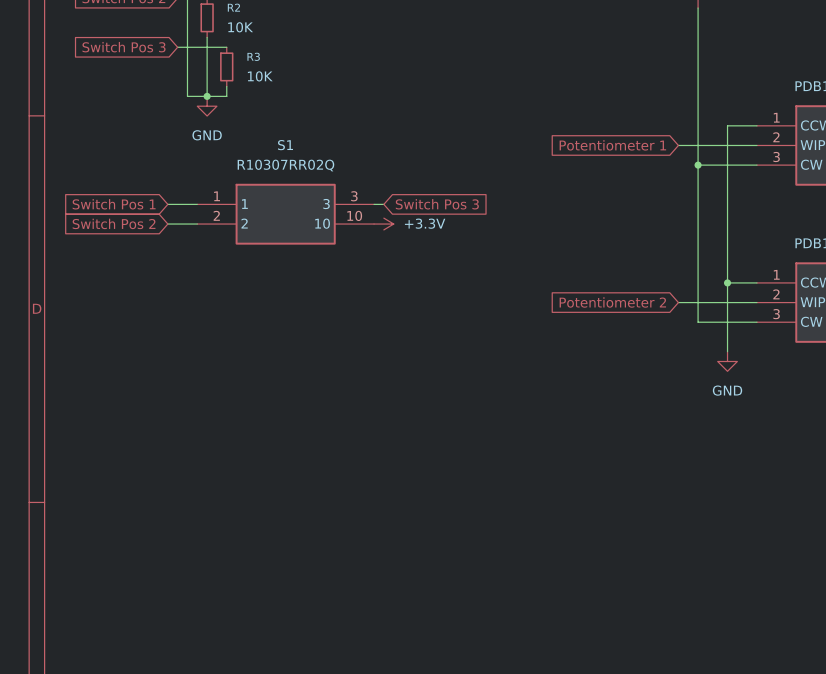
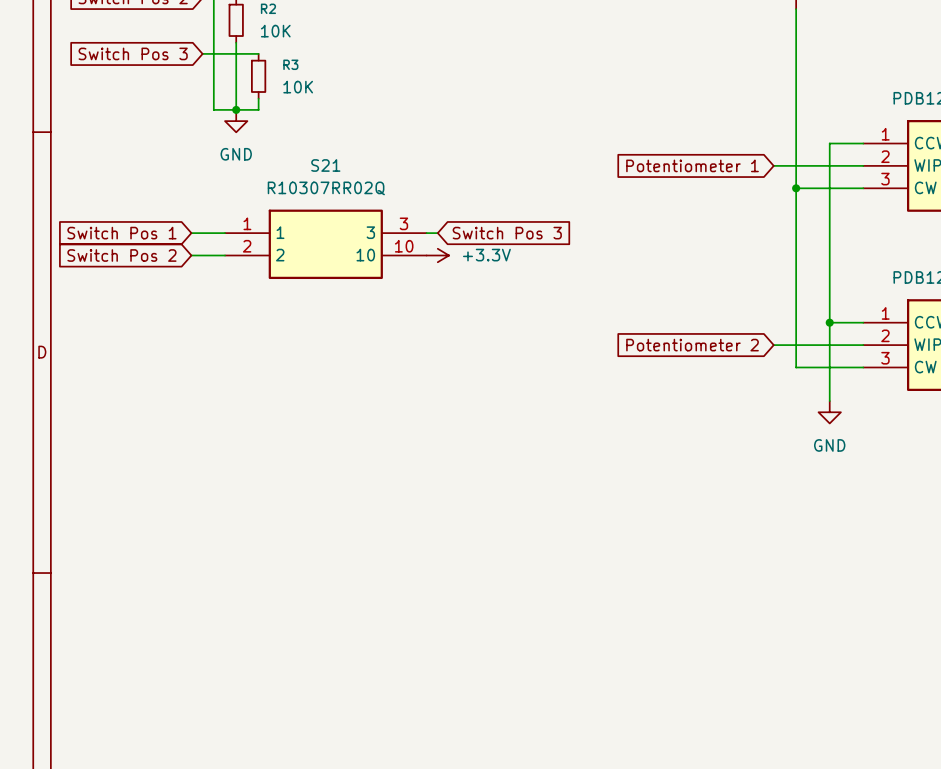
S1 name: S1 (285, 145) -> S21 (325, 165)

